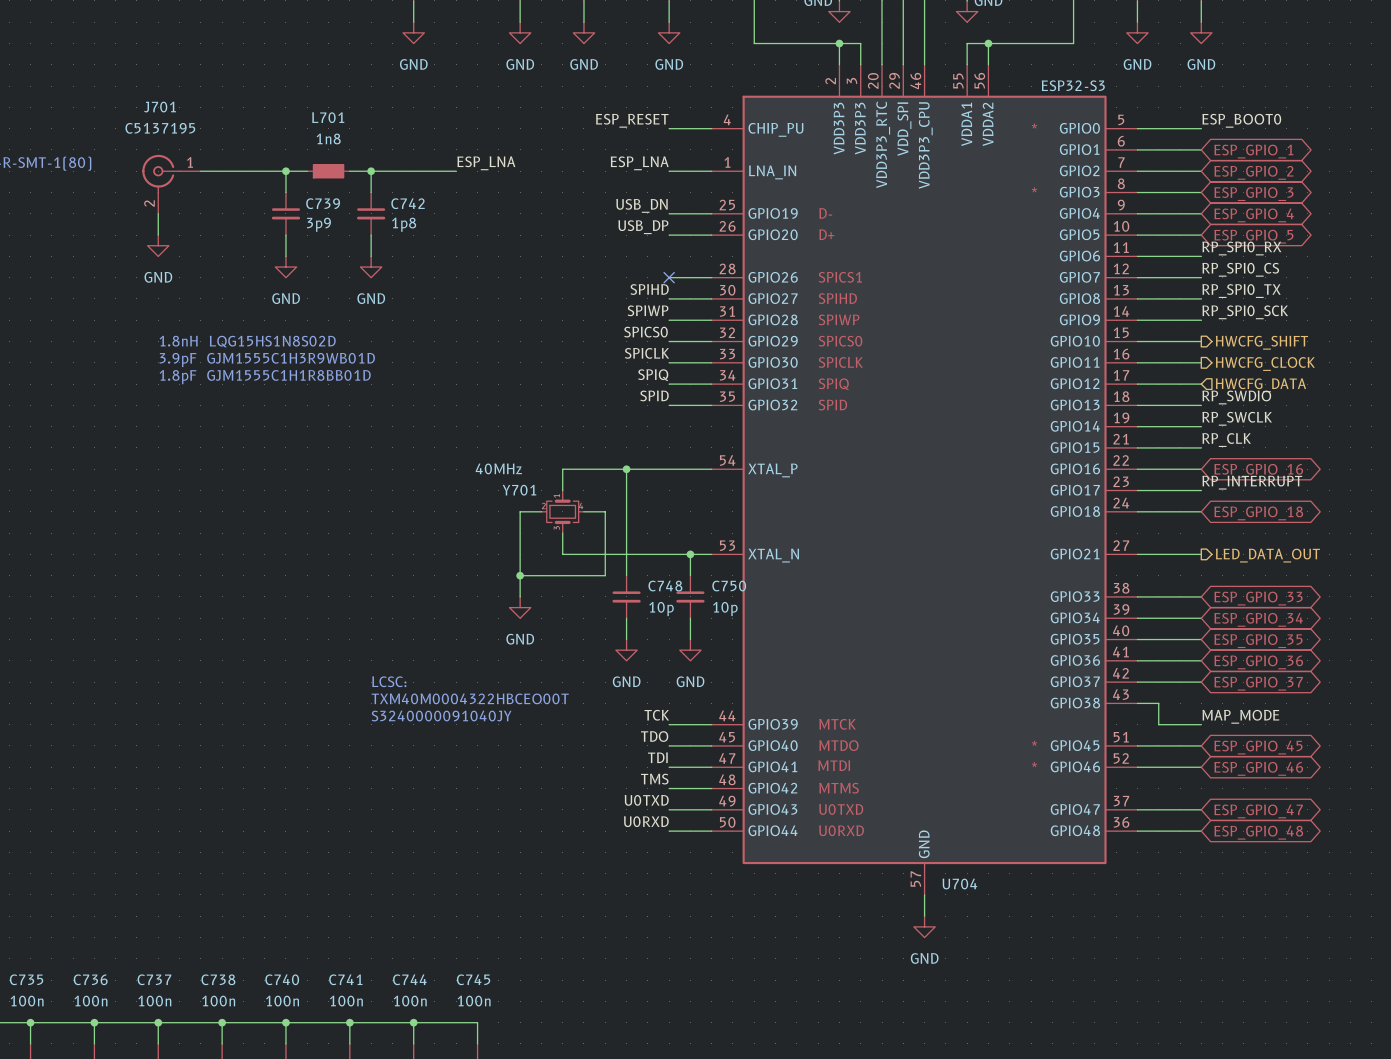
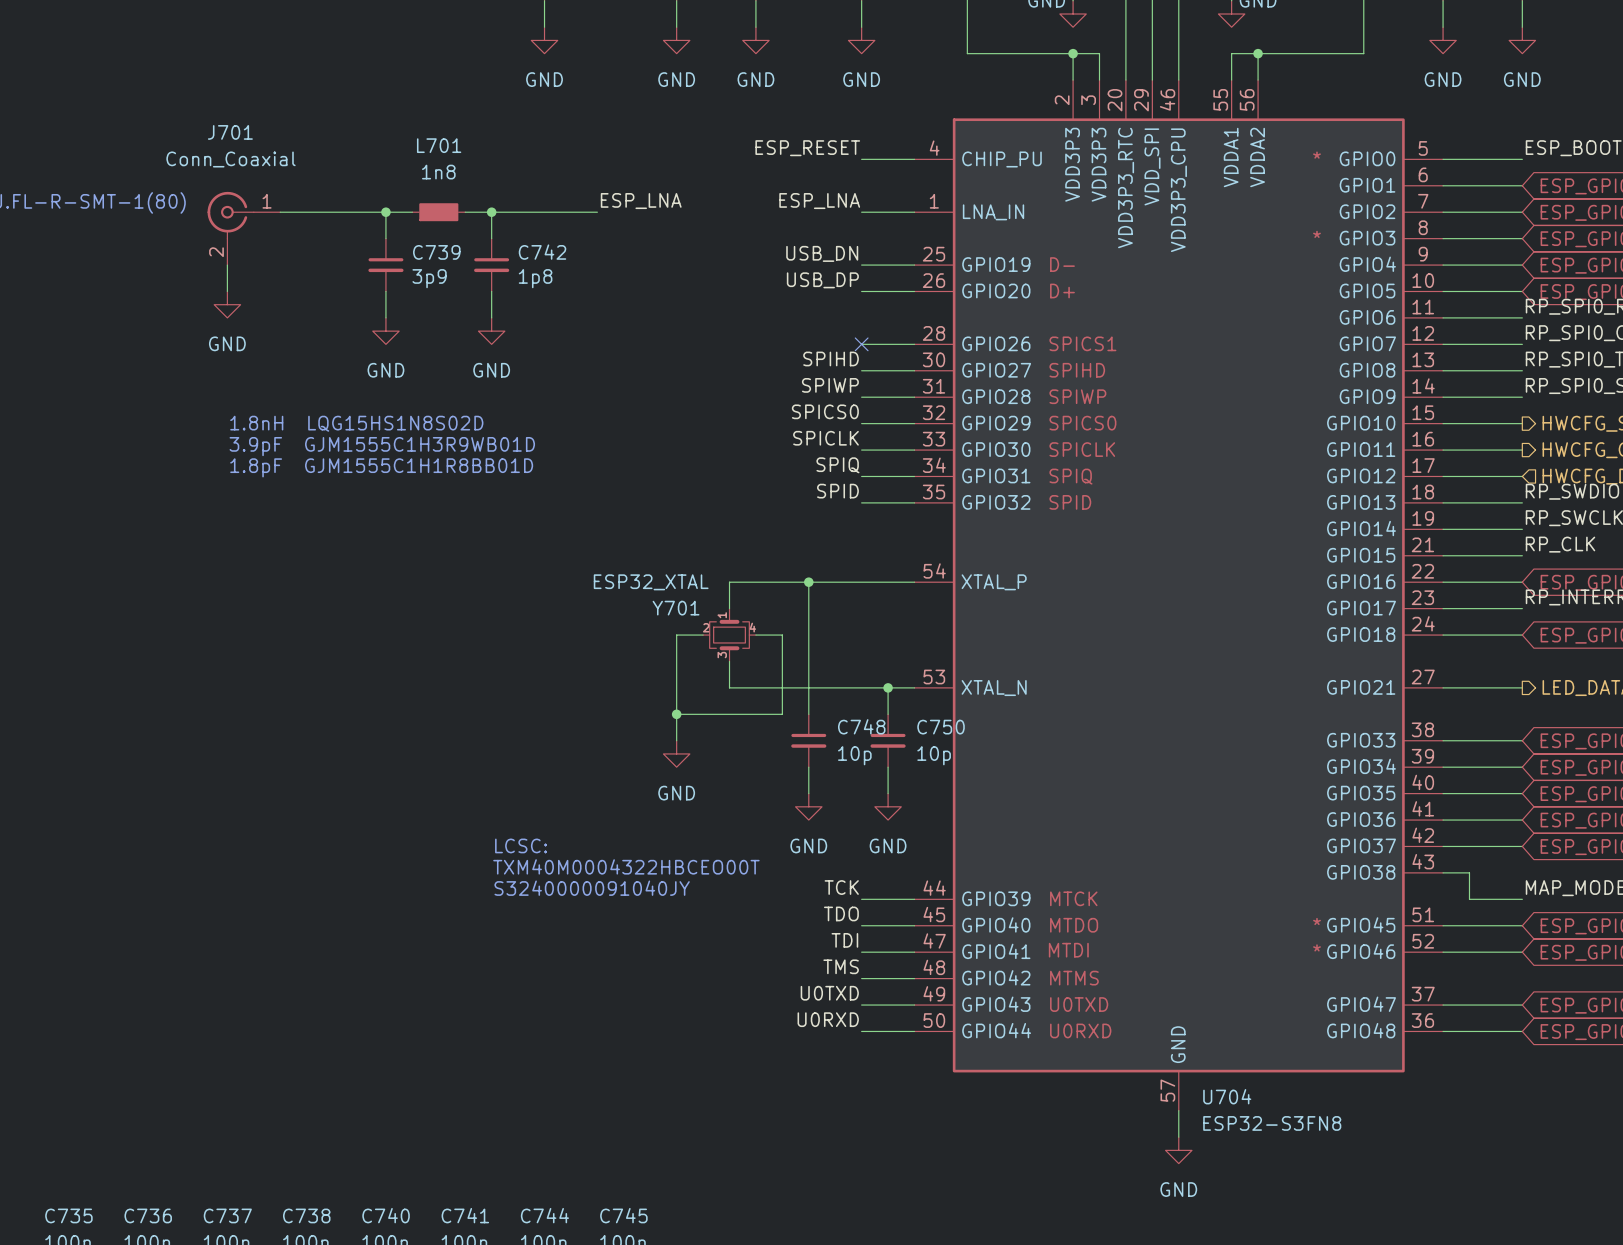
U704 value: ESP32-S3 (1073, 85) -> ESP32-S3FN8 (1272, 1123)
J701 value: C5137195 (160, 128) -> Conn_Coaxial (231, 159)
Y701 value: 40MHz (498, 468) -> ESP32_XTAL (651, 582)

